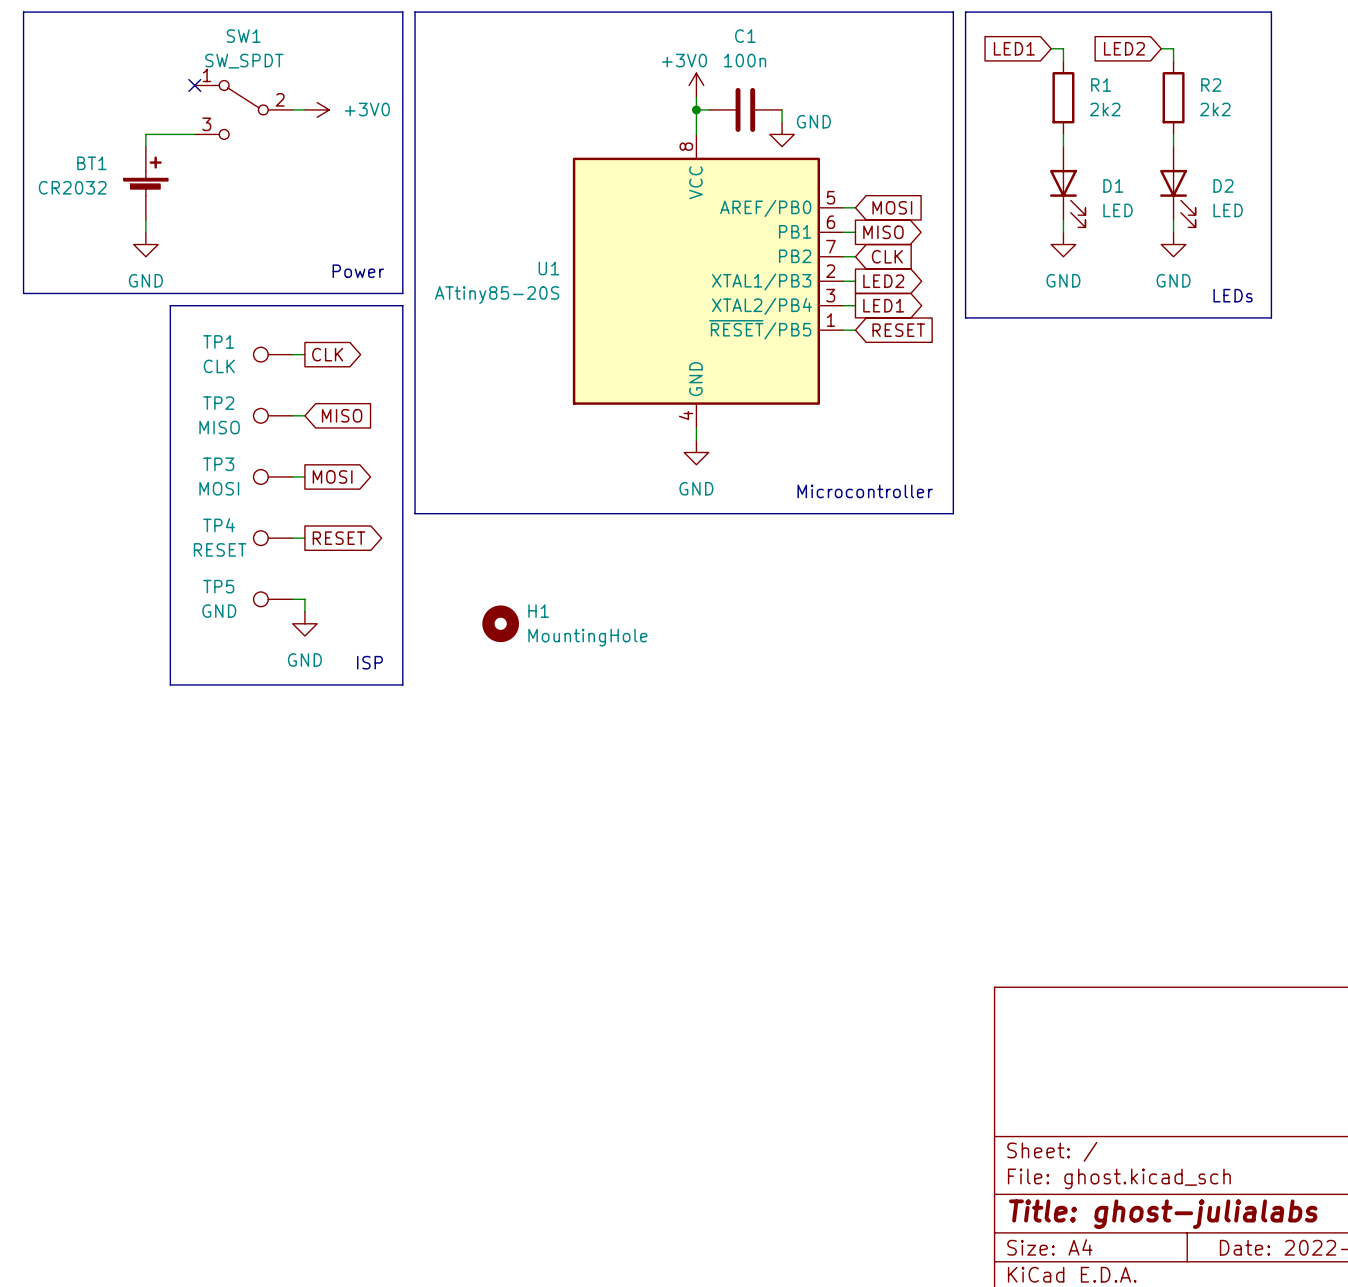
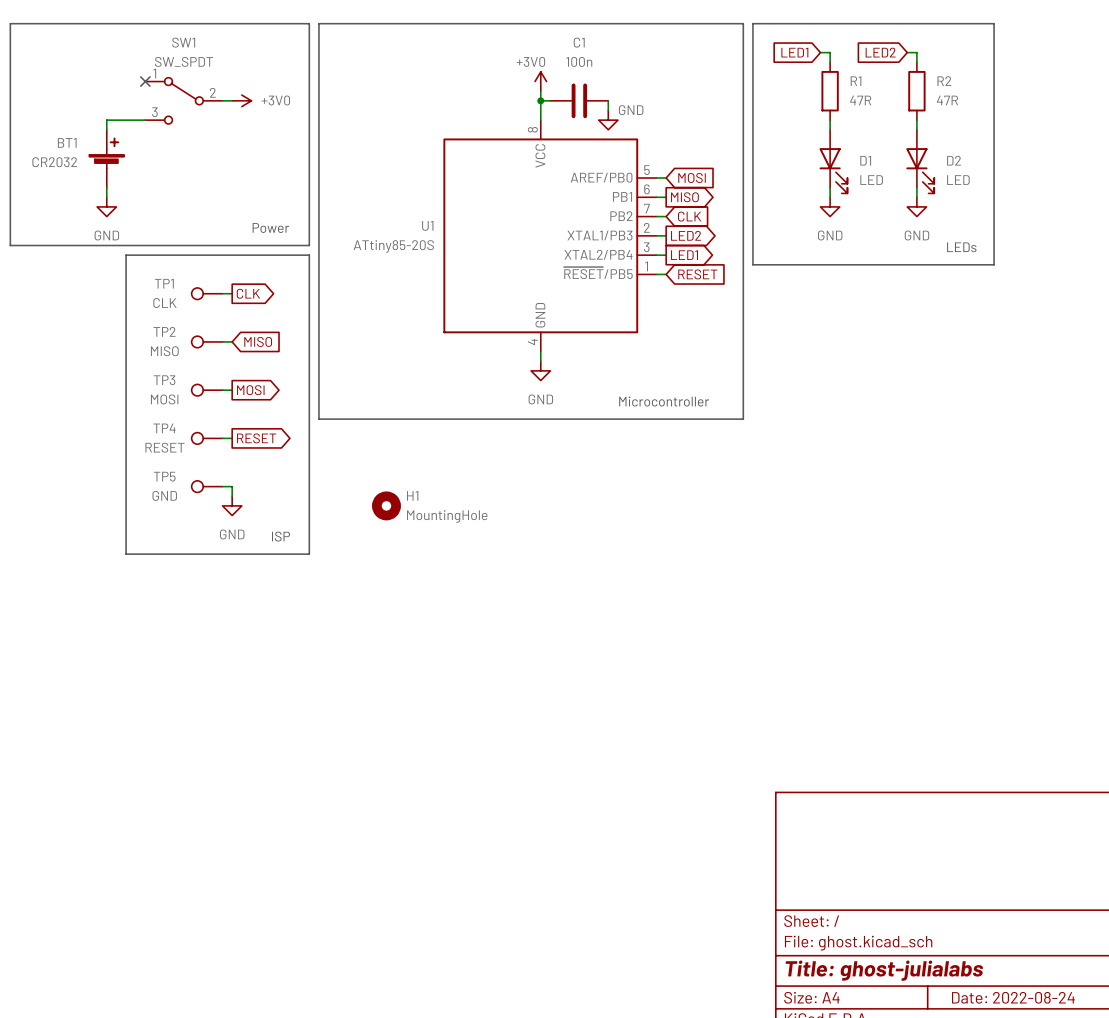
R1 value: 2k2 (1105, 109) -> 47R (860, 100)
R2 value: 2k2 (1215, 109) -> 47R (947, 100)

